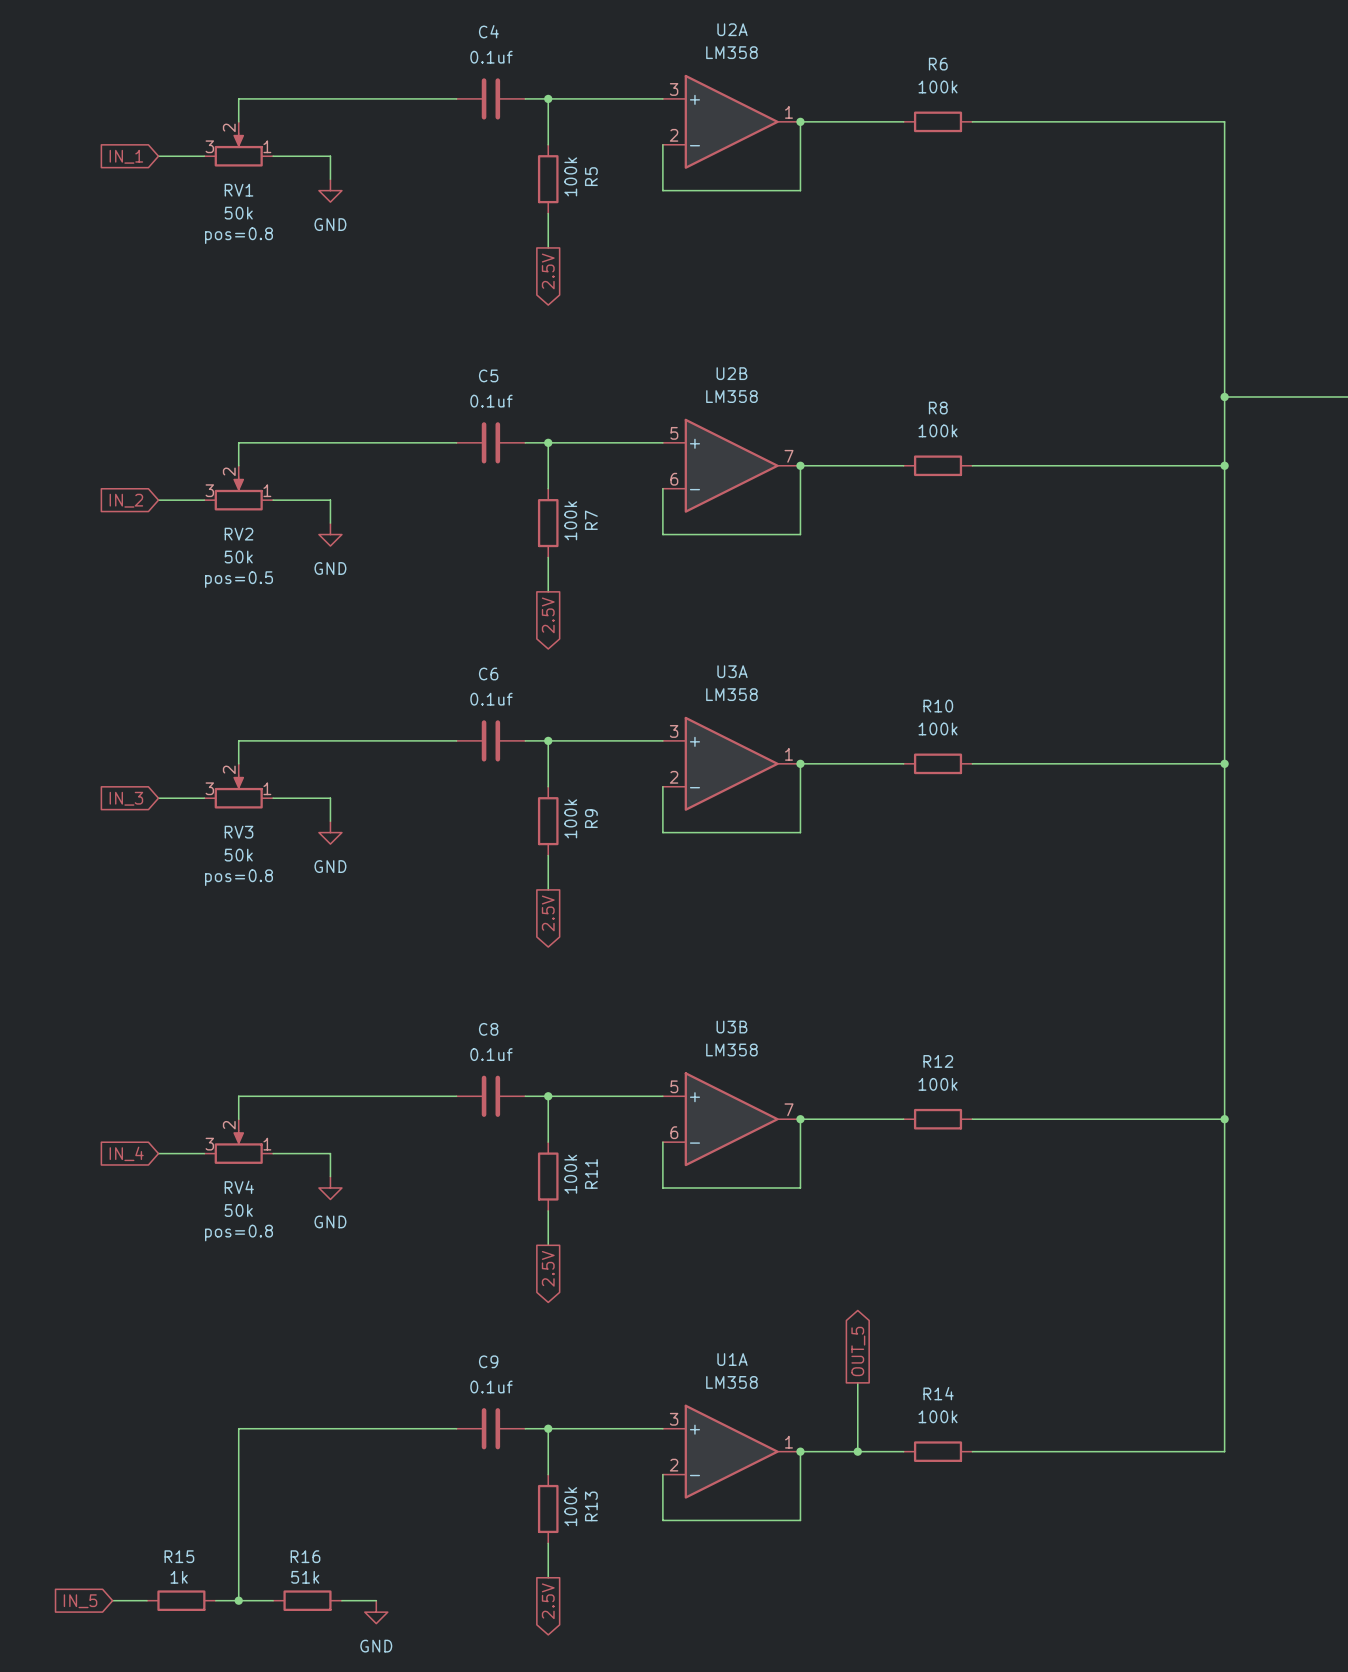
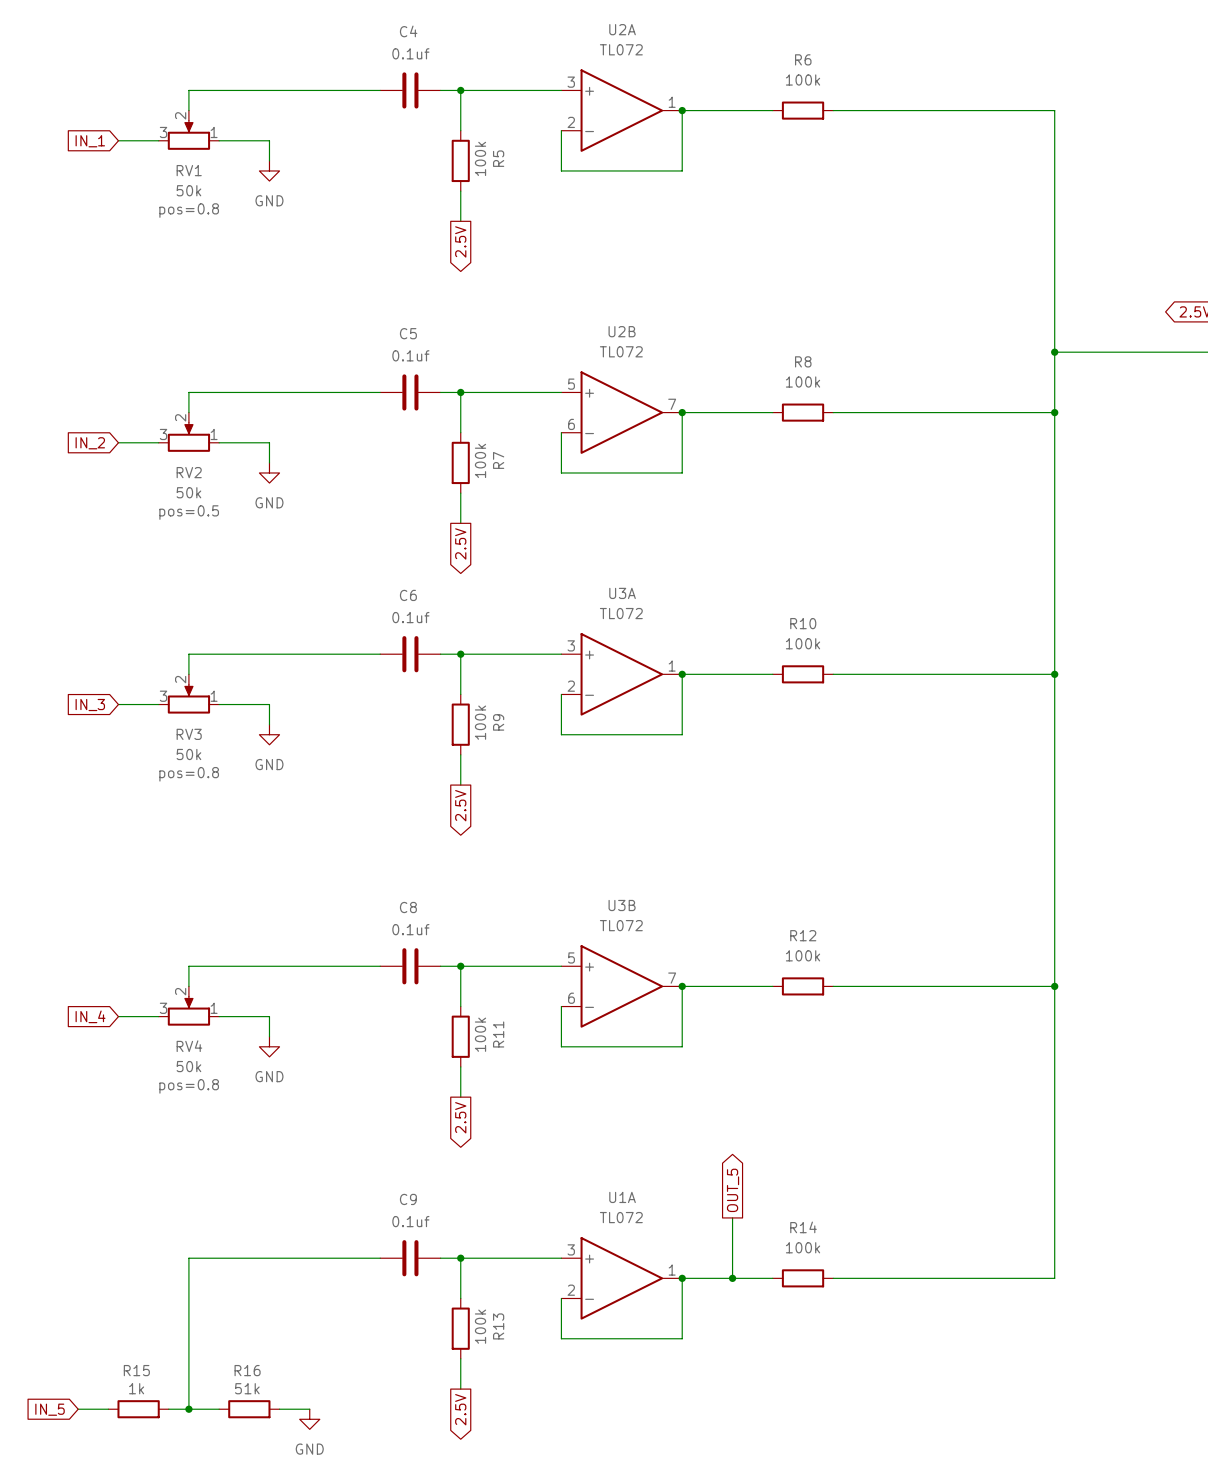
U2A value: LM358 (731, 52) -> TL072 (621, 49)
U2B value: LM358 (731, 396) -> TL072 (621, 351)
U3A value: LM358 (731, 694) -> TL072 (621, 613)
U3B value: LM358 (731, 1050) -> TL072 (621, 925)
U1A value: LM358 (731, 1382) -> TL072 (621, 1217)

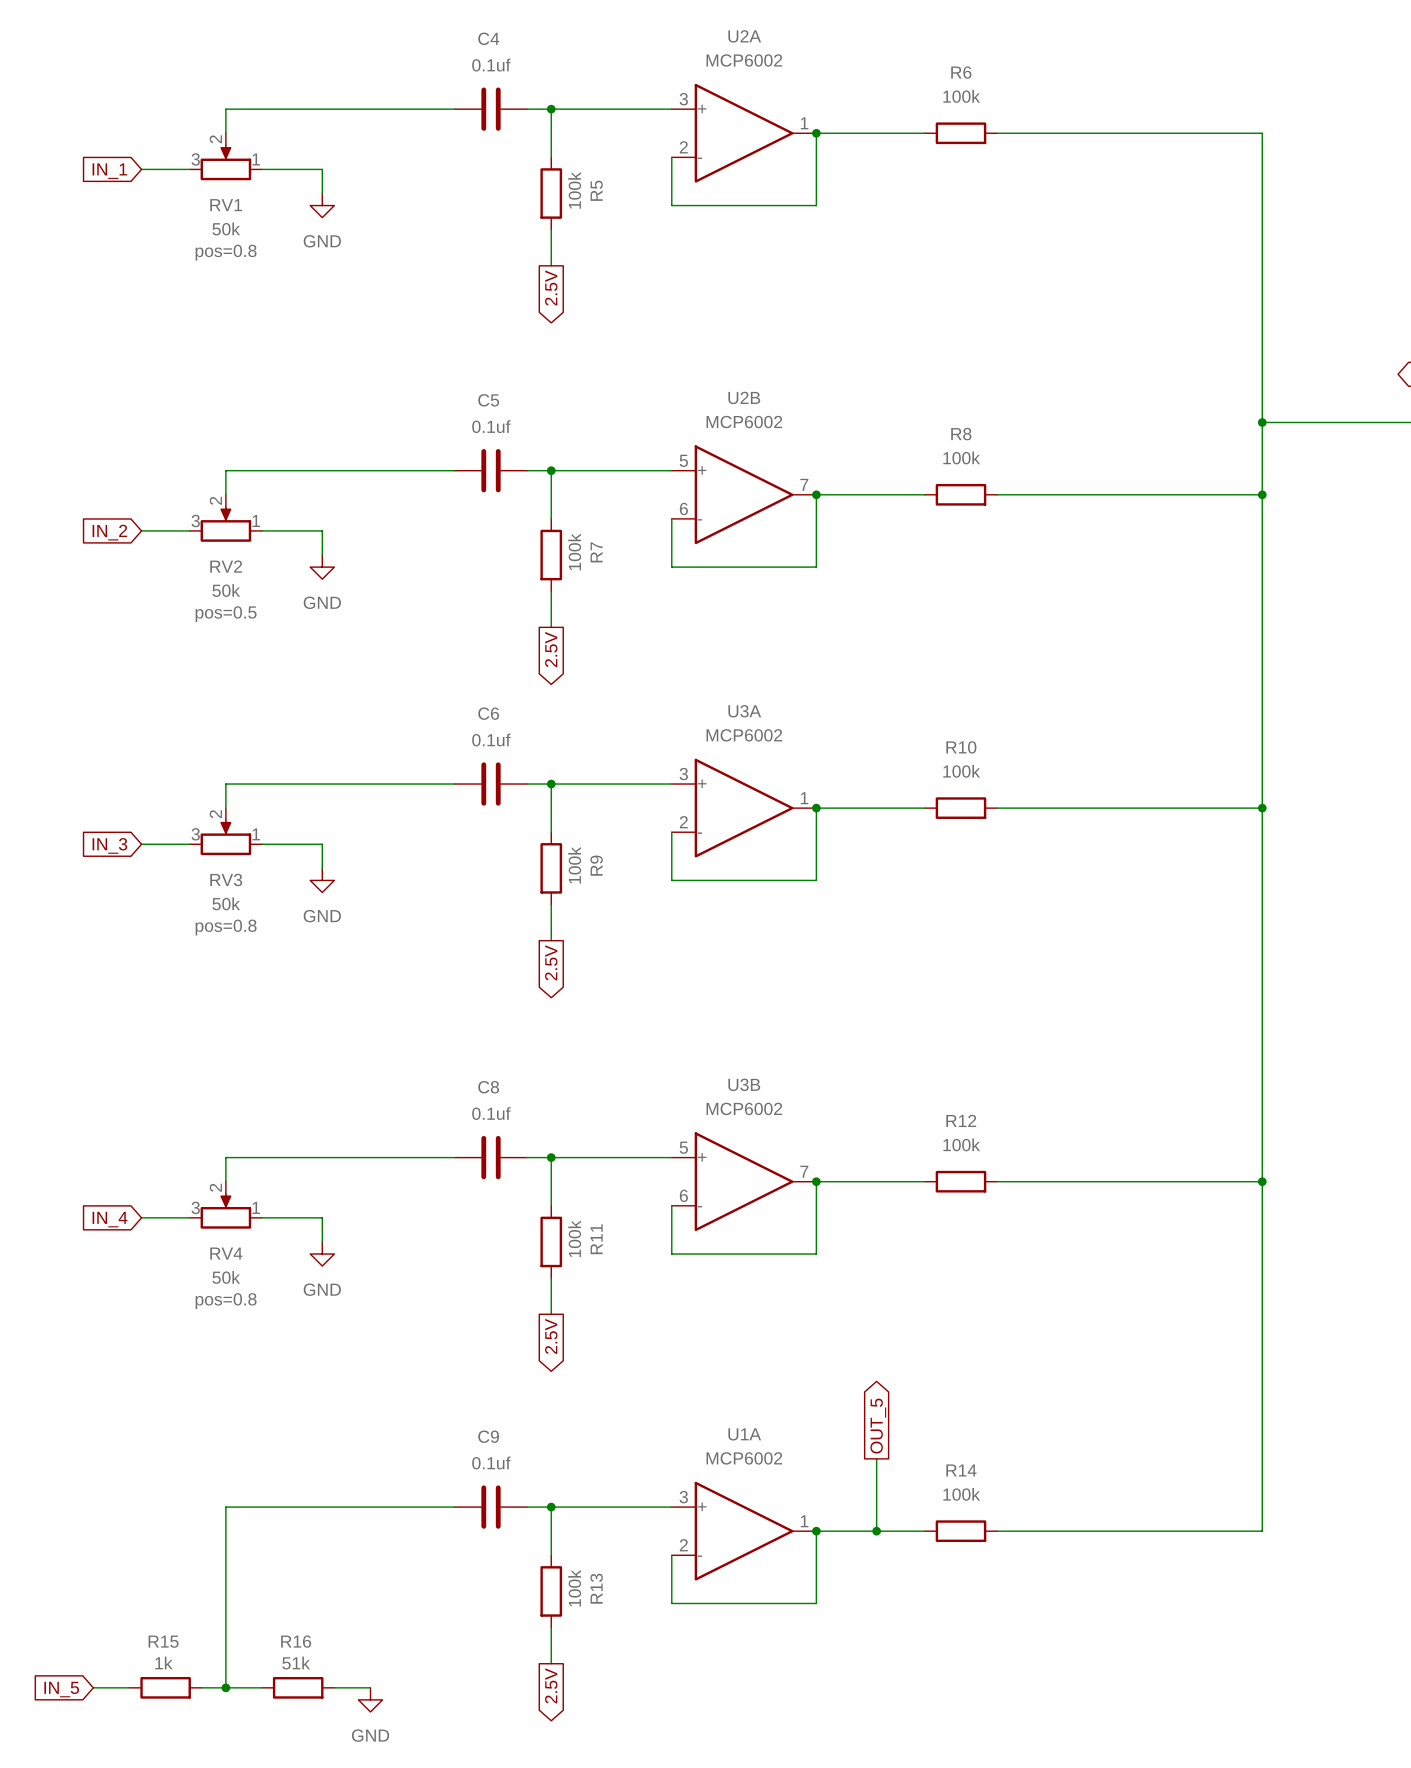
U2A value: TL072 (621, 49) -> MCP6002 (744, 60)
U2B value: TL072 (621, 351) -> MCP6002 (744, 422)
U3A value: TL072 (621, 613) -> MCP6002 (744, 735)
U3B value: TL072 (621, 925) -> MCP6002 (744, 1108)
U1A value: TL072 (621, 1217) -> MCP6002 (744, 1458)

